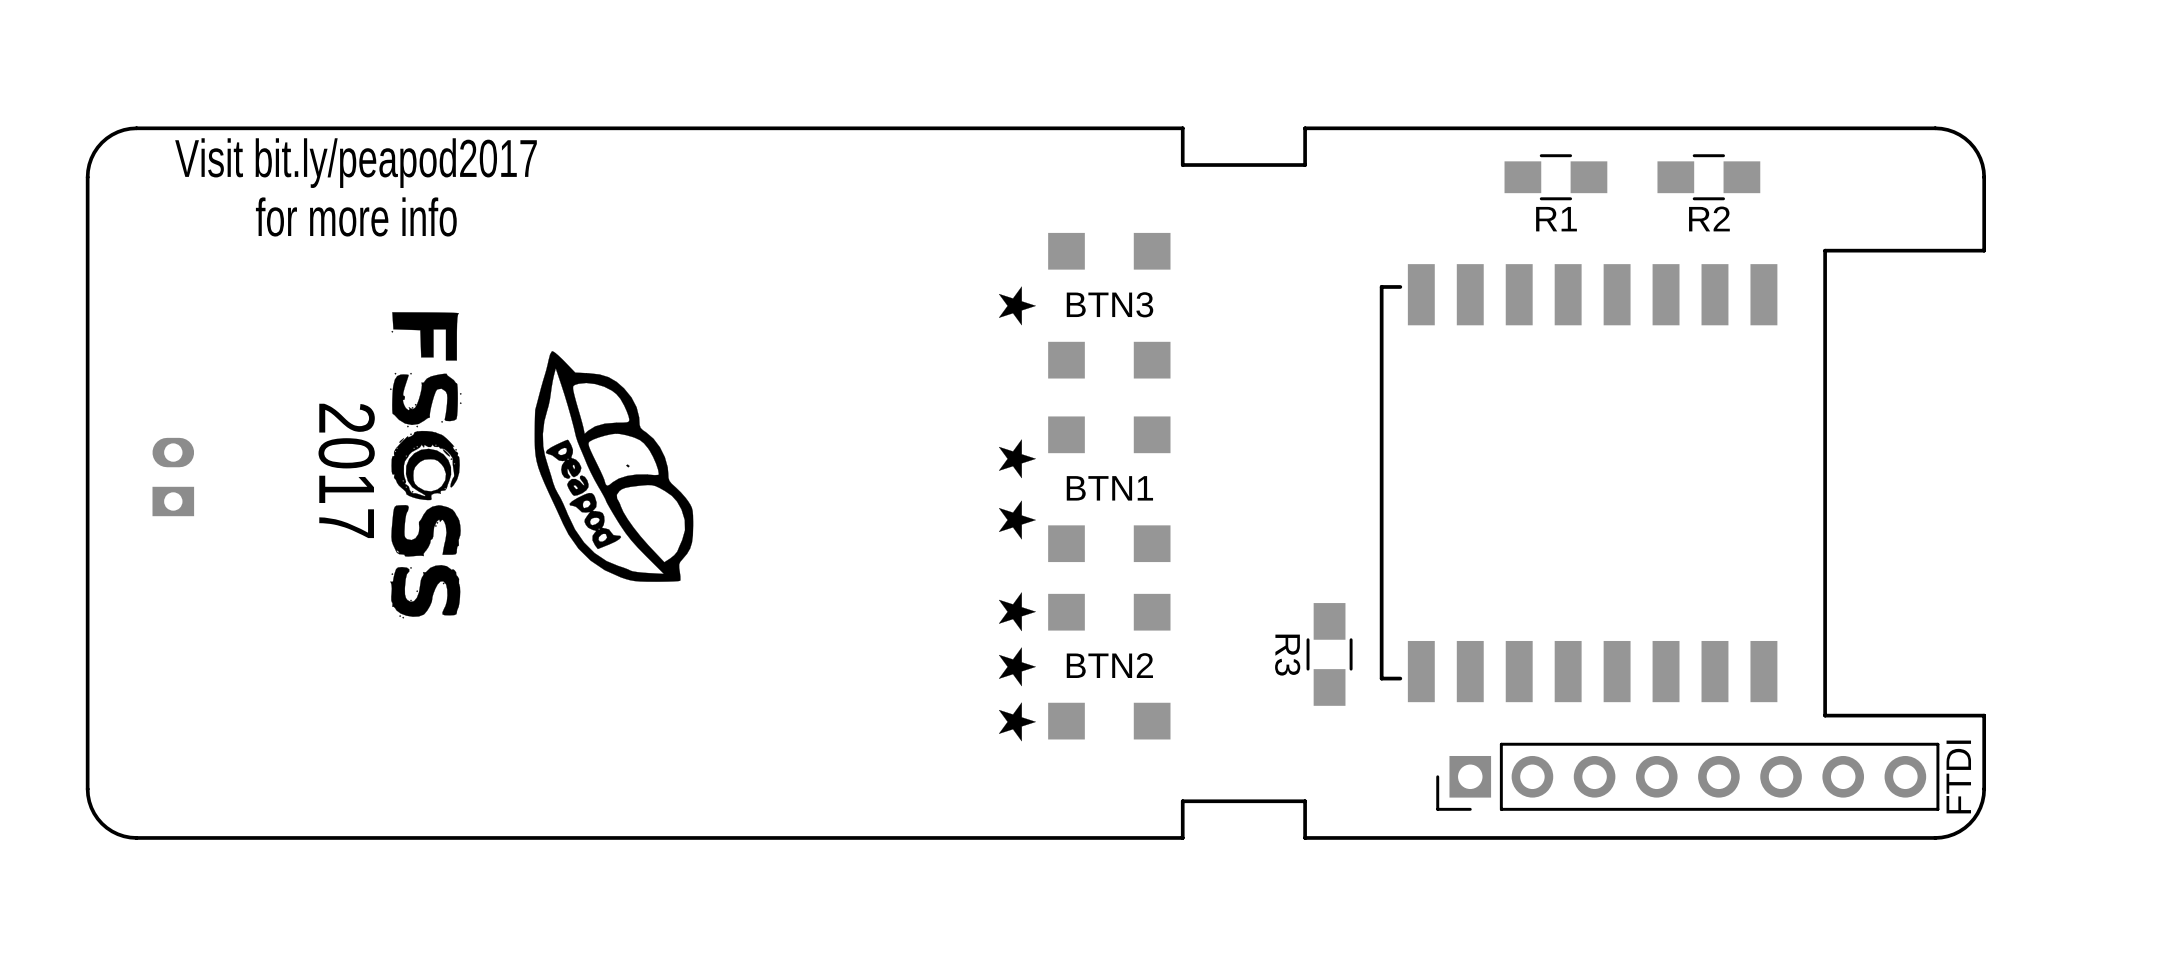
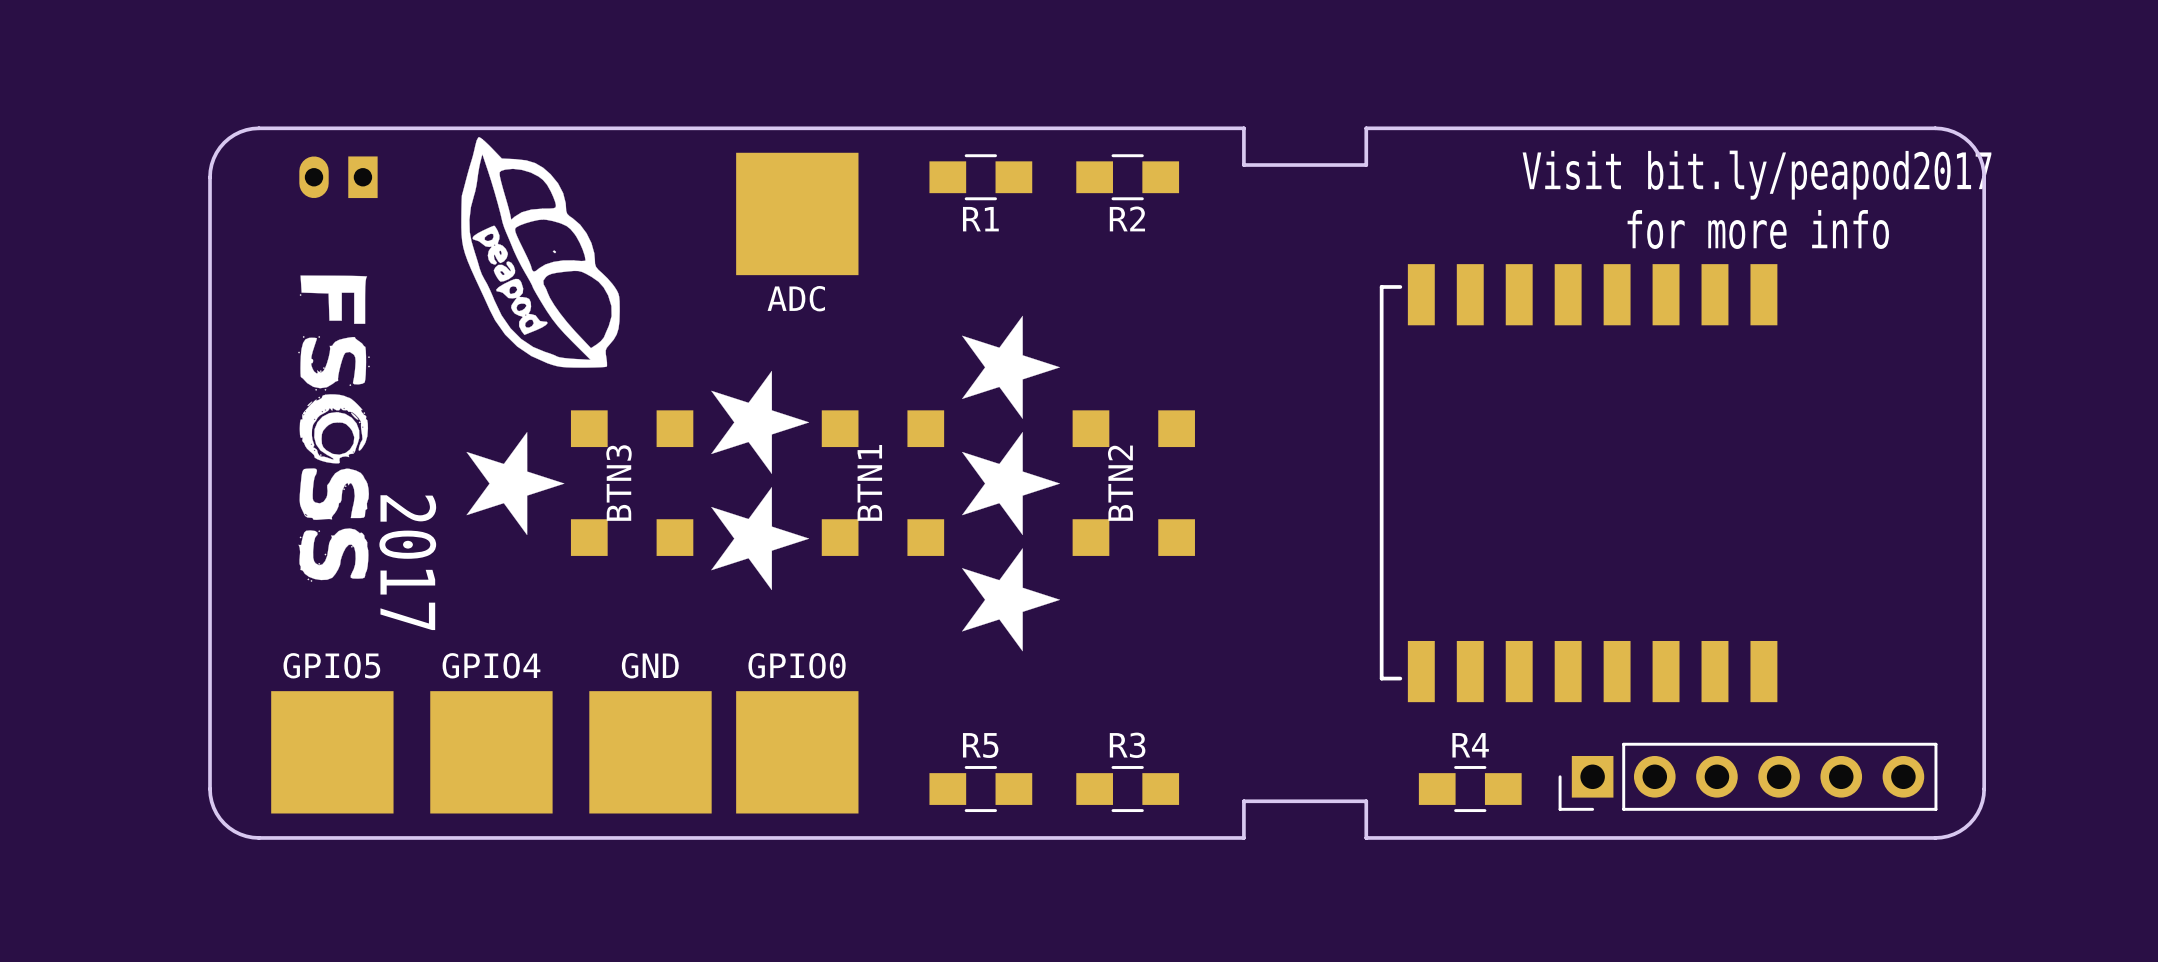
board edge: (258, 128) (136, 128) (123, 129) (112, 134) (97, 147) (91, 158) (87, 177) (87, 789) (89, 801) (94, 813) (101, 823) (112, 831) (123, 836) (136, 837) (258, 837) -> (258, 128) (240, 132) (224, 142) (213, 158) (210, 177) (210, 795) (216, 813) (229, 827) (240, 834) (258, 837)
board edge: (1182, 128) (1182, 165) (1243, 165) -> (1182, 128) (1243, 128) (1243, 165)
board edge: (1366, 128) (1305, 128) (1305, 165) -> (1366, 128) (1366, 165) (1305, 165)
text: Visit bit.ly/peapod2017 (356, 163) -> none
text: none -> Visit bit.ly/peapod2017 (1757, 175)
R1 position: (1555, 177) -> (980, 177)
R2 position: (1708, 177) -> (1127, 177)
part: none -> (797, 213)
text: for more info (356, 216) -> none
text: none -> for more info (1758, 229)
board edge: (1984, 250) (1825, 250) (1825, 715) (1984, 715) -> (1984, 250) (1984, 715)
drawing: [998, 286, 1036, 326] -> none
text: none -> ADC (796, 298)
BTN3 name rotation: 0° (1109, 304) -> 90° counterclockwise (619, 483)
BTN3 position: (1109, 305) -> (632, 483)
drawing: none -> [962, 315, 1060, 536]
drawing: none -> [711, 370, 810, 591]
drawing: none -> [466, 432, 565, 536]
drawing: [998, 439, 1036, 540] -> none
drawing position: (425, 465) -> (334, 428)
drawing position: (613, 466) -> (540, 252)
text position: 2017 (346, 470) -> 2017 (407, 562)
part rotation: 0° (173, 477) -> 90° counterclockwise (338, 177)
part position: (173, 477) -> (338, 177)
BTN1 name rotation: 0° (1109, 488) -> 90° counterclockwise (869, 482)
BTN1 position: (1109, 489) -> (882, 483)
drawing shape: [998, 592, 1036, 632] -> [962, 548, 1060, 652]
drawing: [998, 647, 1036, 742] -> none
part: (1329, 654) -> none
text: R3 (1287, 655) -> none
text: none -> GPIO5 (331, 665)
text: none -> GPIO4 (491, 665)
text: none -> GND (650, 665)
text: none -> GPIO0 (797, 665)
BTN2 name rotation: 0° (1109, 665) -> 90° counterclockwise (1120, 483)
BTN2 position: (1109, 666) -> (1133, 483)
part: none -> (332, 752)
part: none -> (491, 752)
part: none -> (723, 752)
FTDI: (1687, 776) -> none
part: none -> (1748, 776)
R5: none -> (980, 789)
R3: none -> (1127, 789)
R4: none -> (1470, 789)
board edge: (1243, 801) (1182, 801) (1182, 837) -> (1243, 801) (1243, 837) (1182, 837)
board edge: (1305, 801) (1305, 837) (1366, 837) -> (1305, 801) (1366, 801) (1366, 837)

